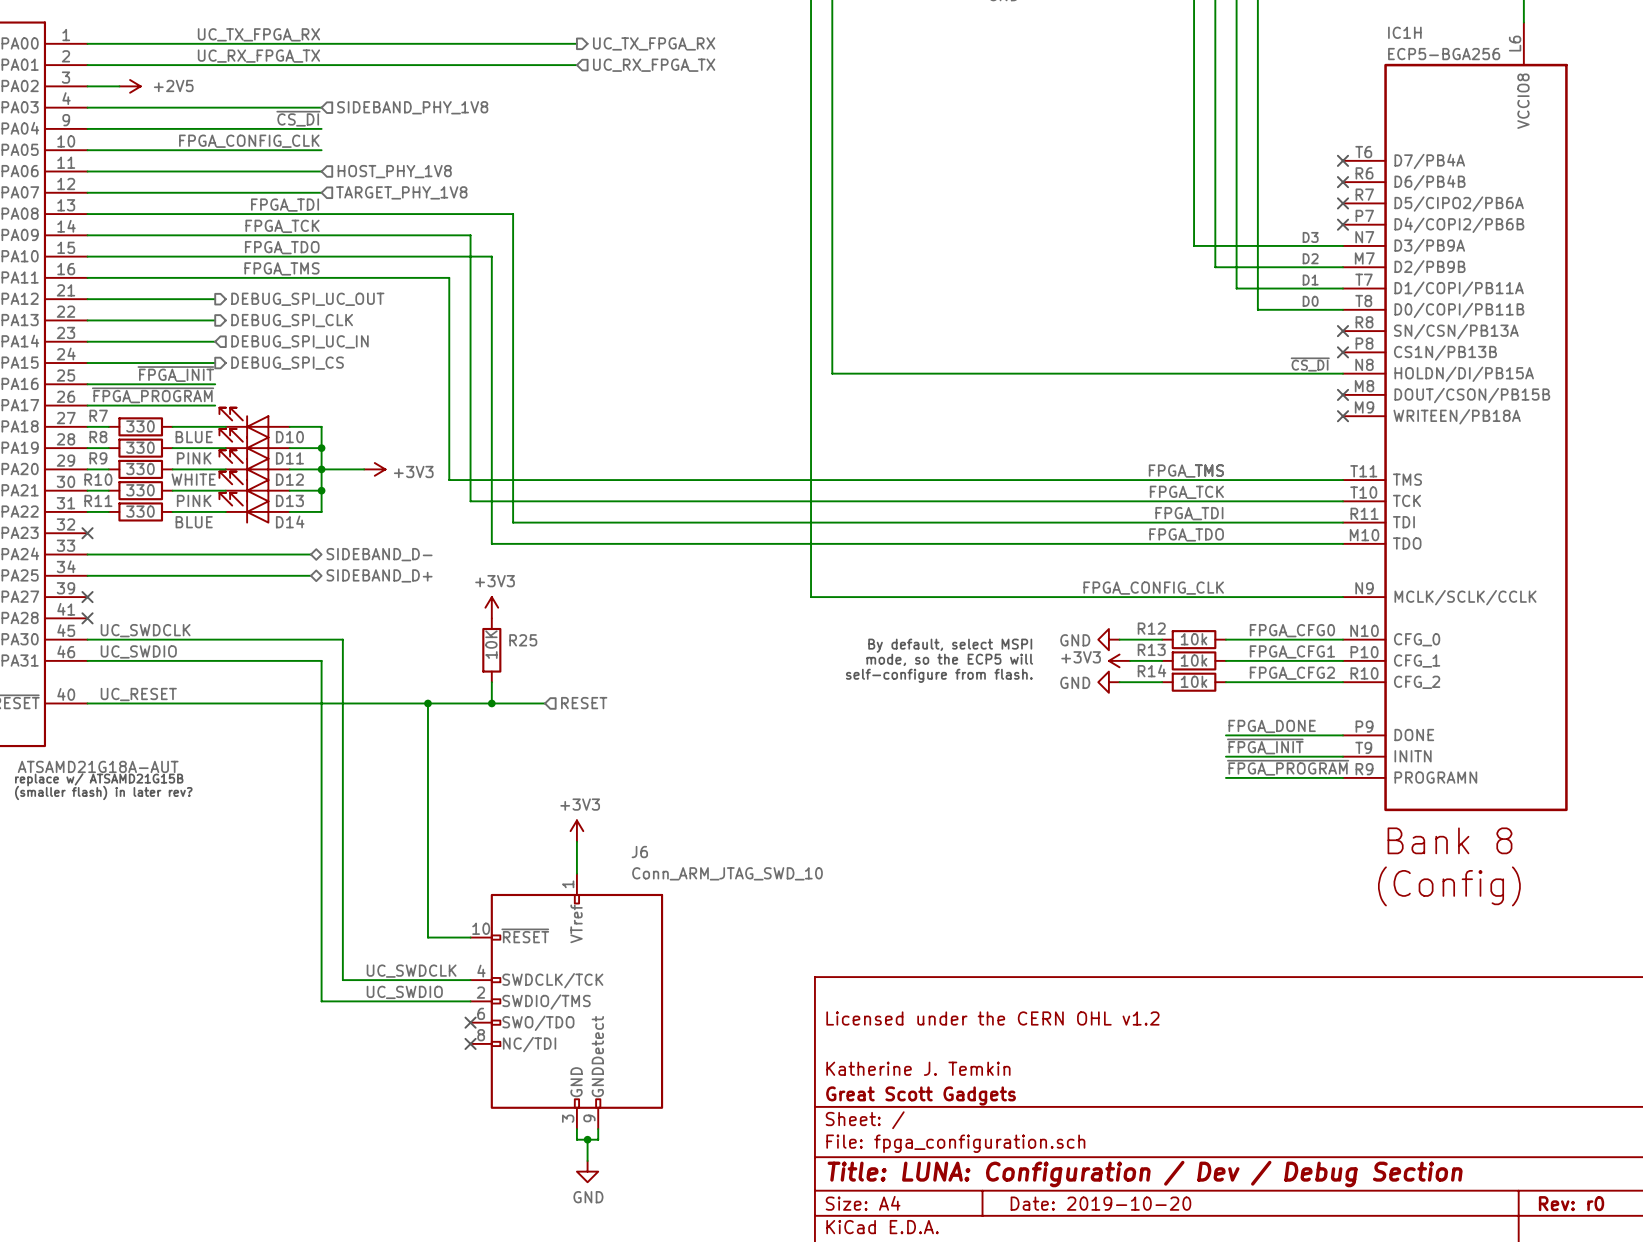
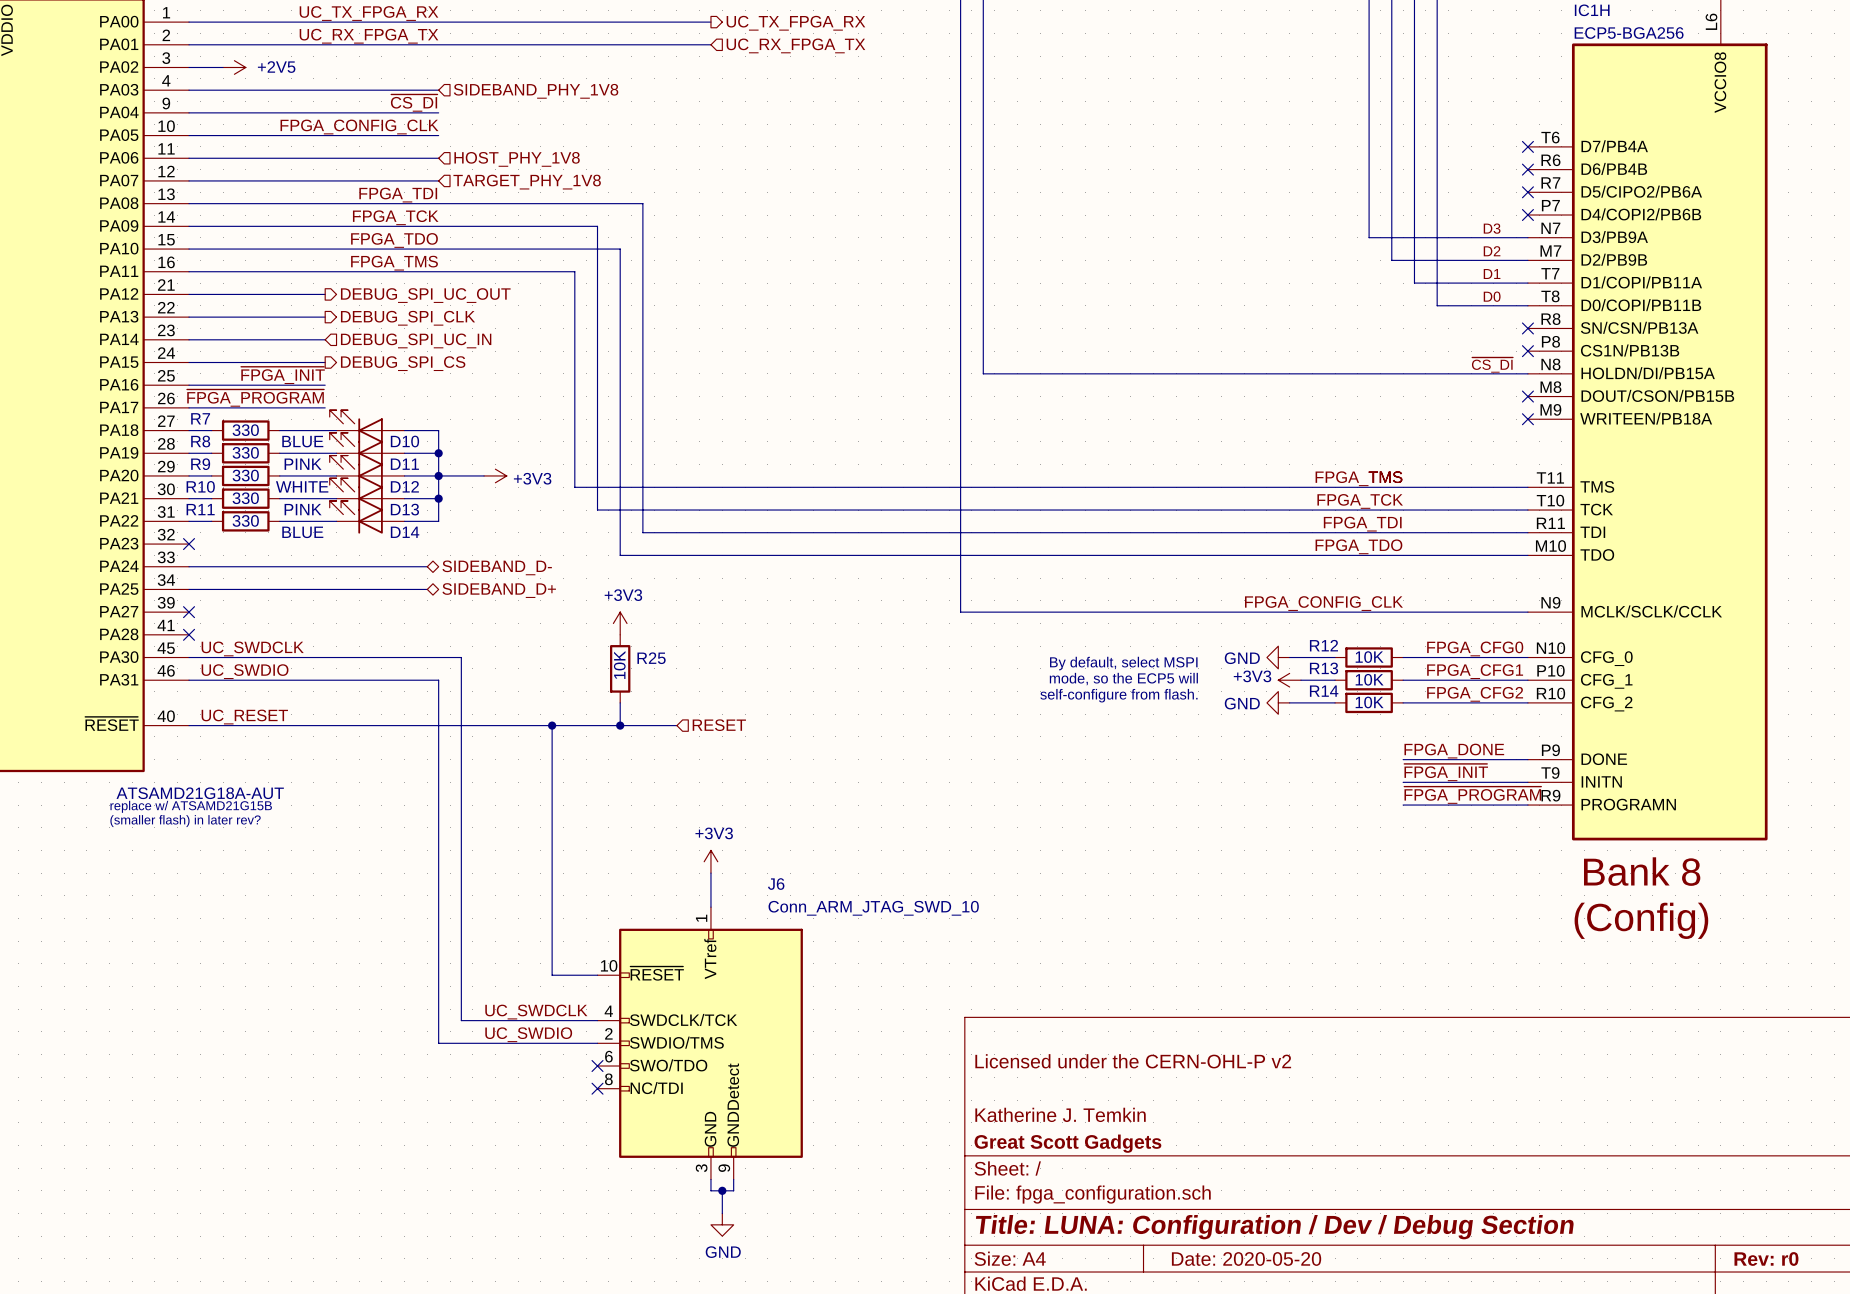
R12 value: 10k (1194, 639) -> 10K (1369, 657)
R13 value: 10k (1194, 660) -> 10K (1369, 679)
R14 value: 10k (1194, 681) -> 10K (1369, 702)
title block: Licensed under the CERN OHL v1.2 (992, 1018) -> Licensed under the CERN-OHL-P v2 (1133, 1061)
title block: Date: 2019-10-20 (1100, 1203) -> Date: 2020-05-20 (1246, 1258)

